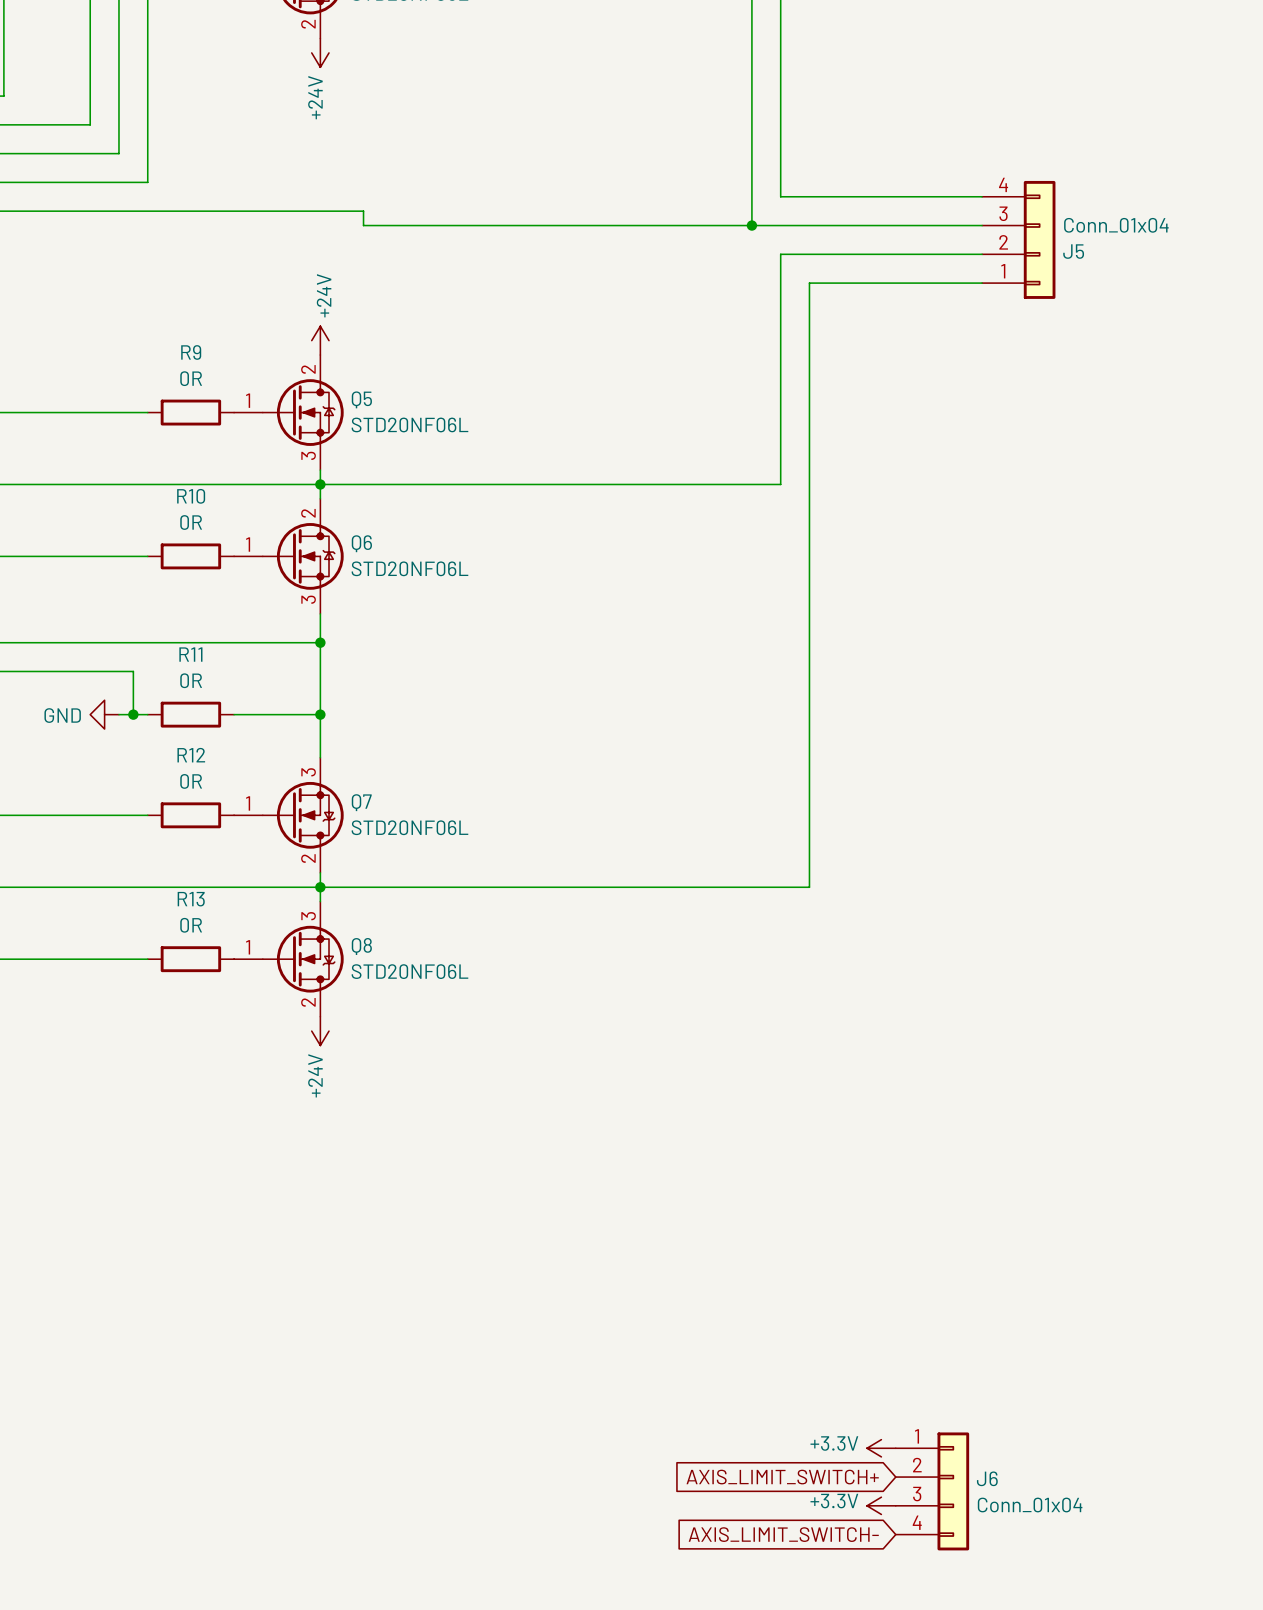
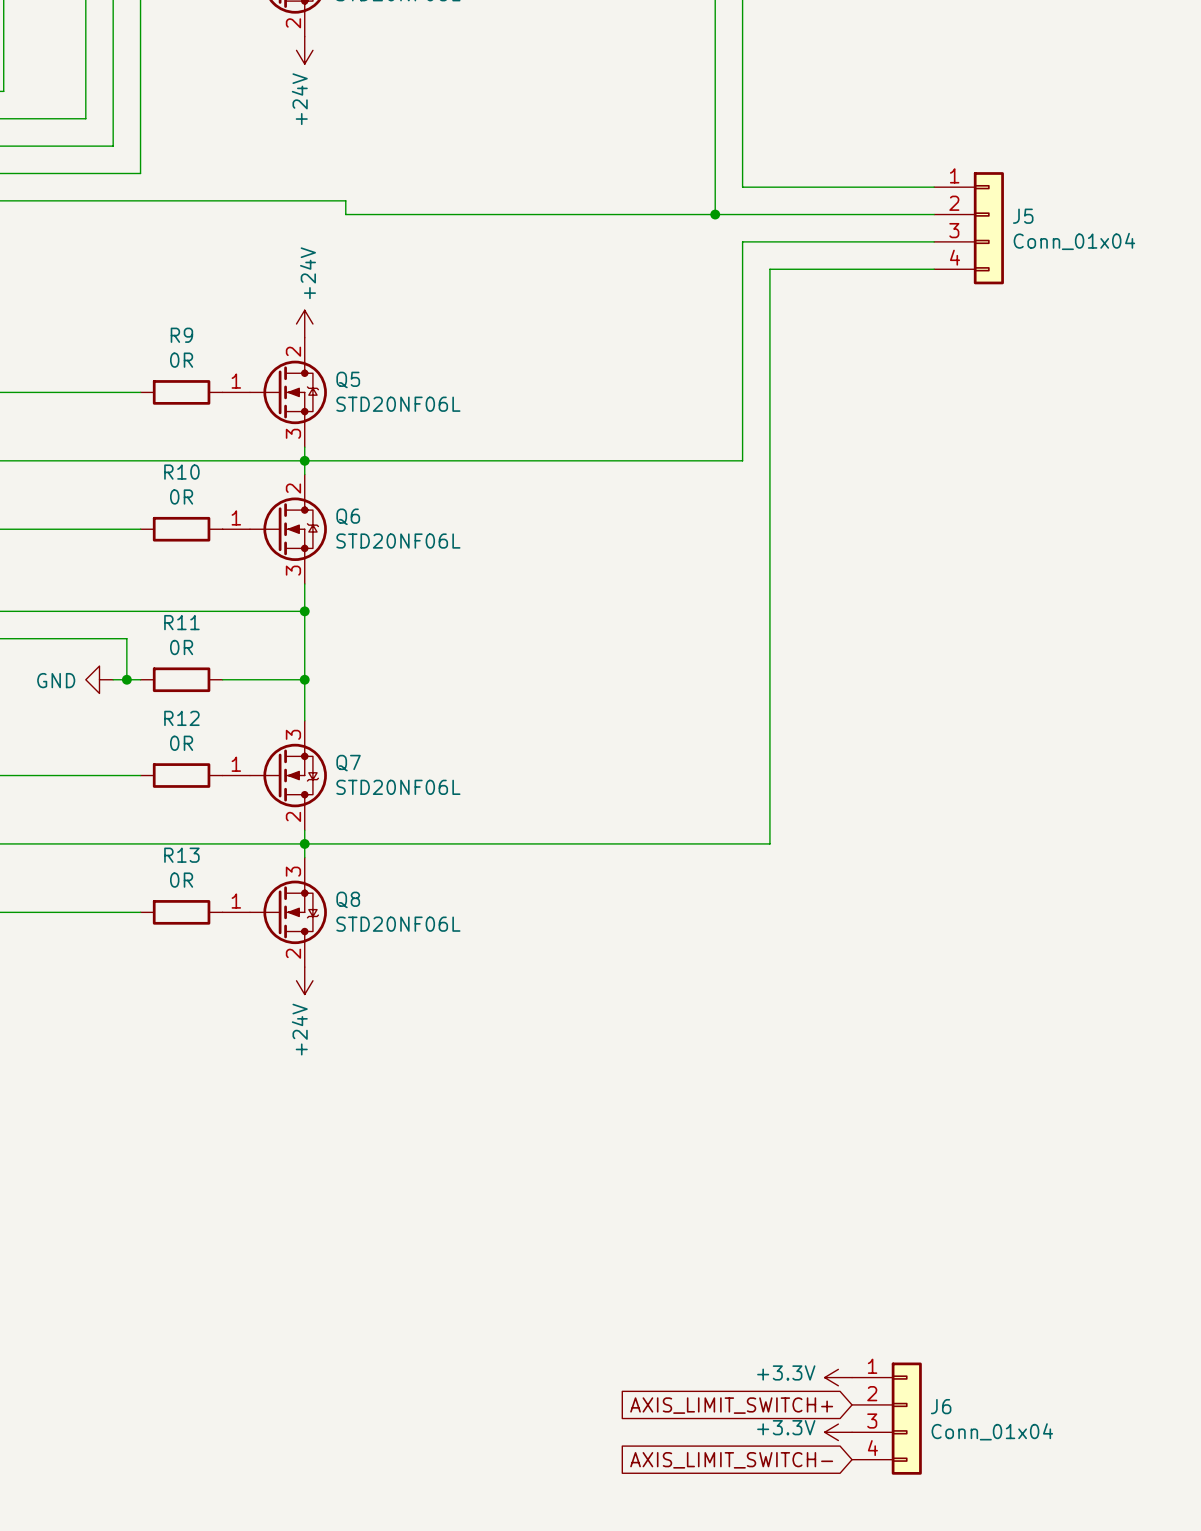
J5 flip: as is (1039, 239) -> up-down (988, 228)

